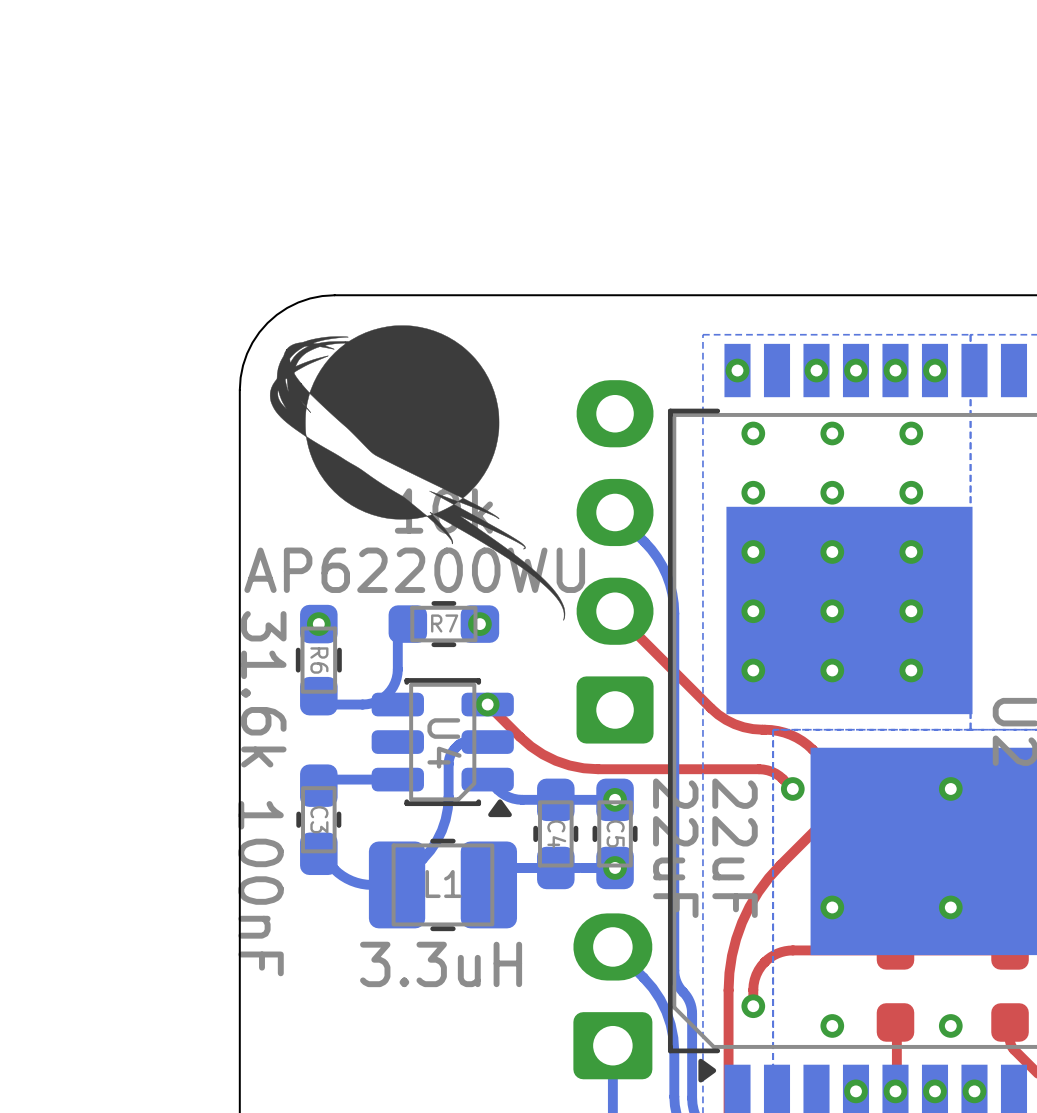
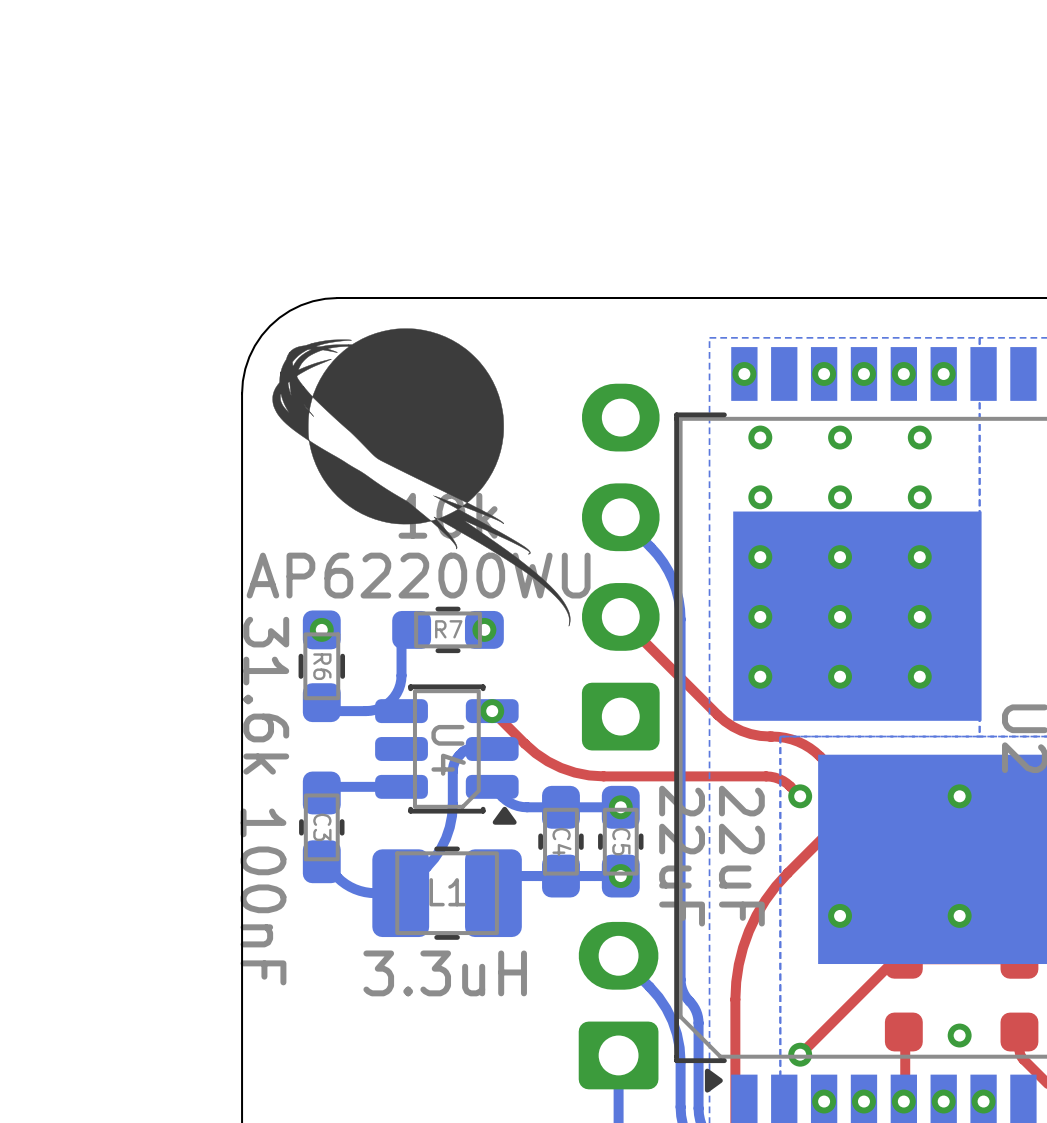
top track: (887, 950) (792, 950) (777, 953) (764, 962) (756, 974) (753, 984) (753, 1006) -> (895, 959) (800, 1054)
via: (753, 1006) -> none
via: (832, 1025) -> none
via: none -> (800, 1054)
via: none -> (824, 1101)

